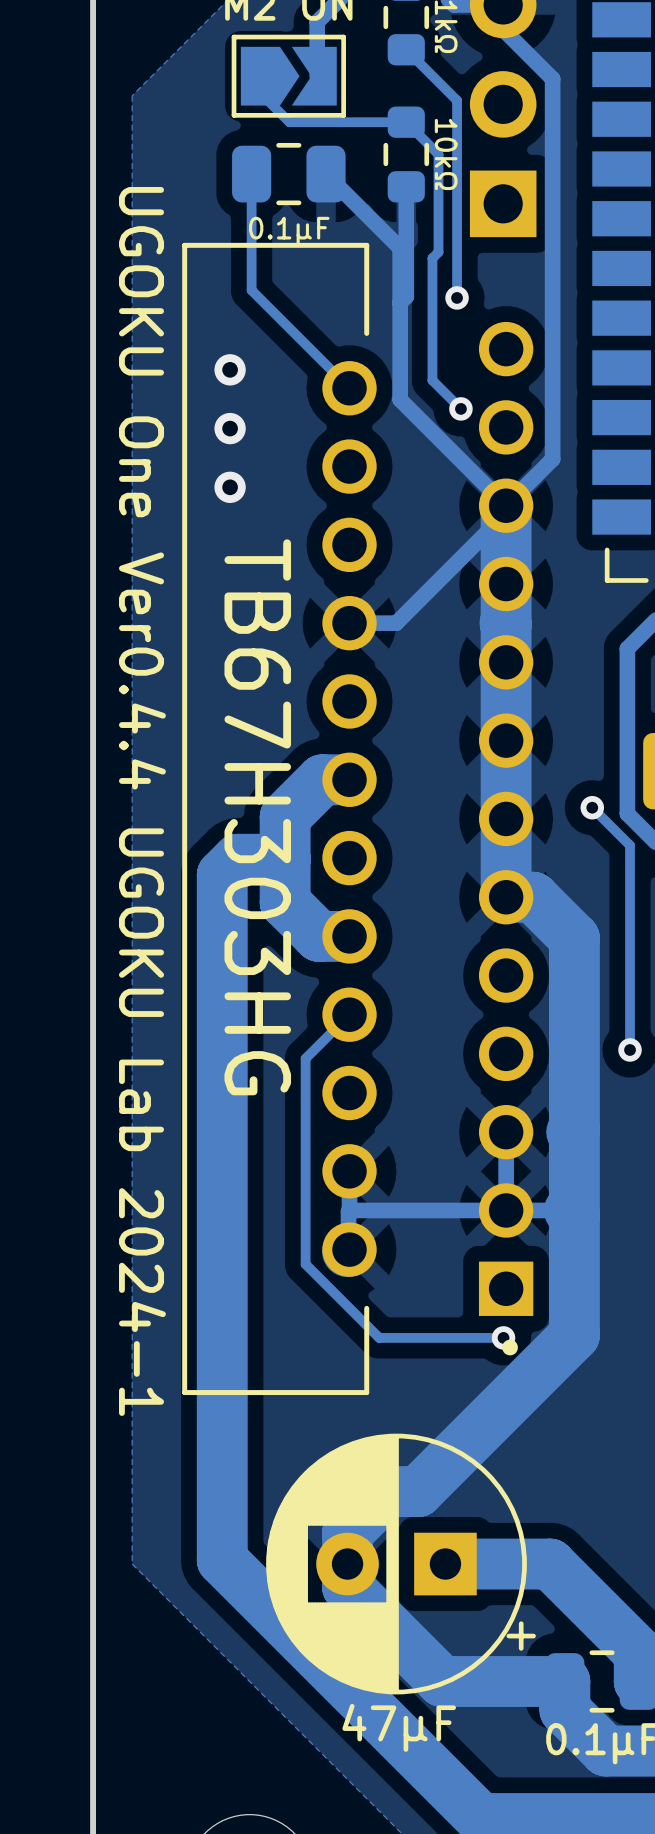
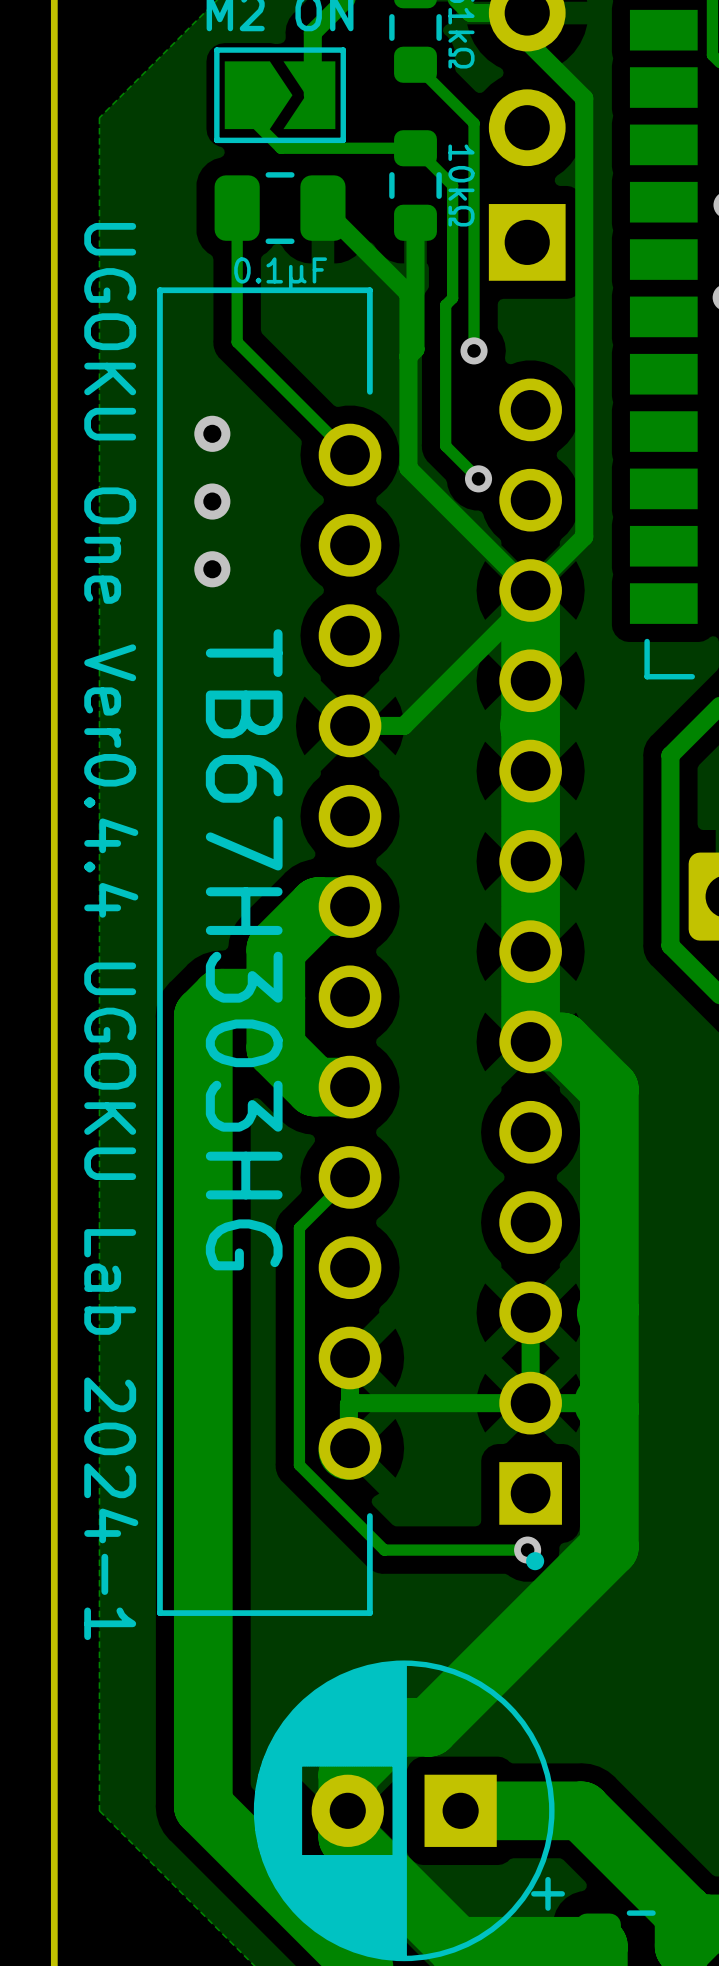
track: (592, 807) (630, 845) (630, 1049) -> none
via: (592, 807) -> none
via: (630, 1049) -> none

